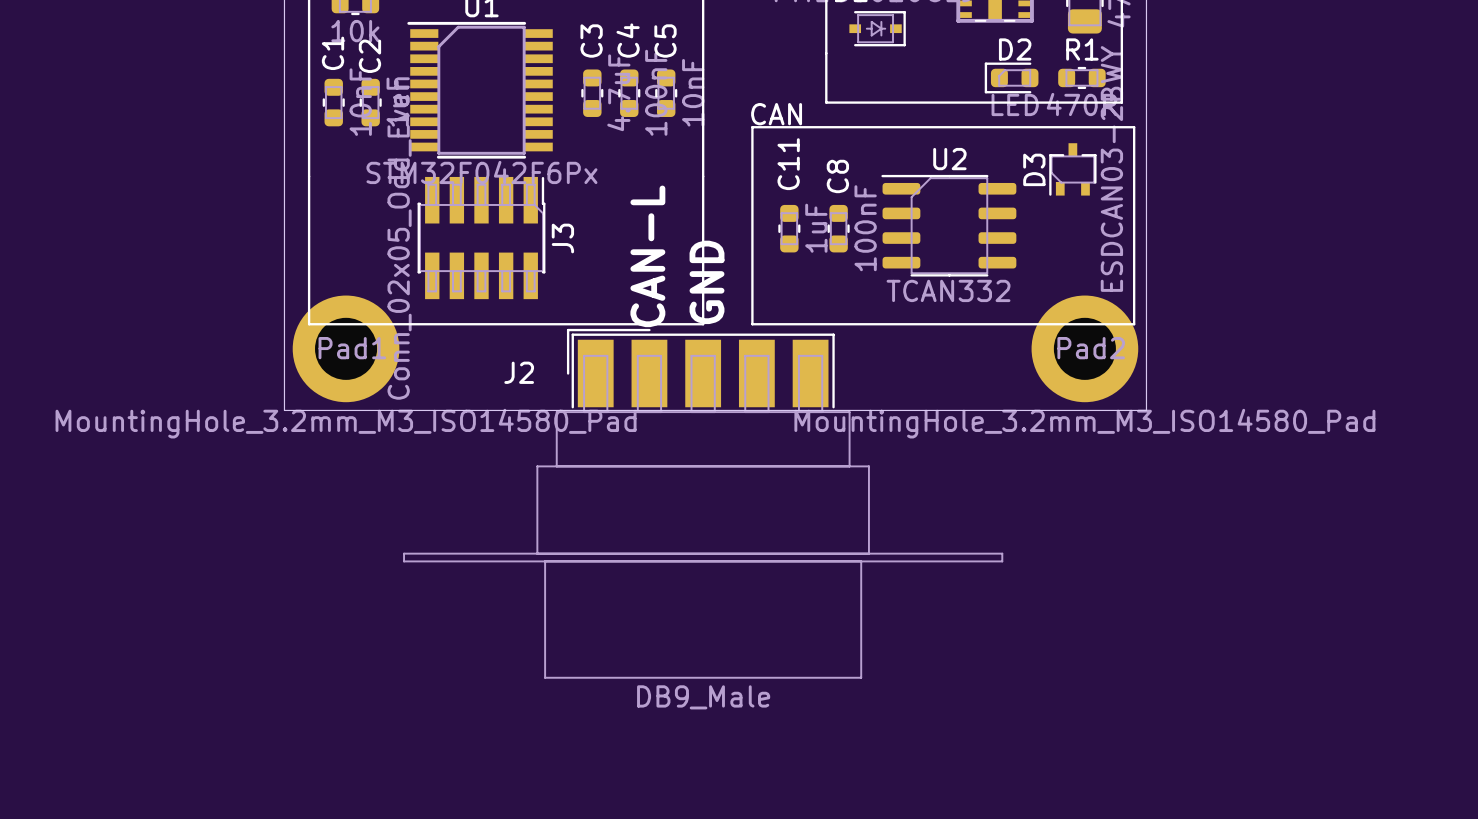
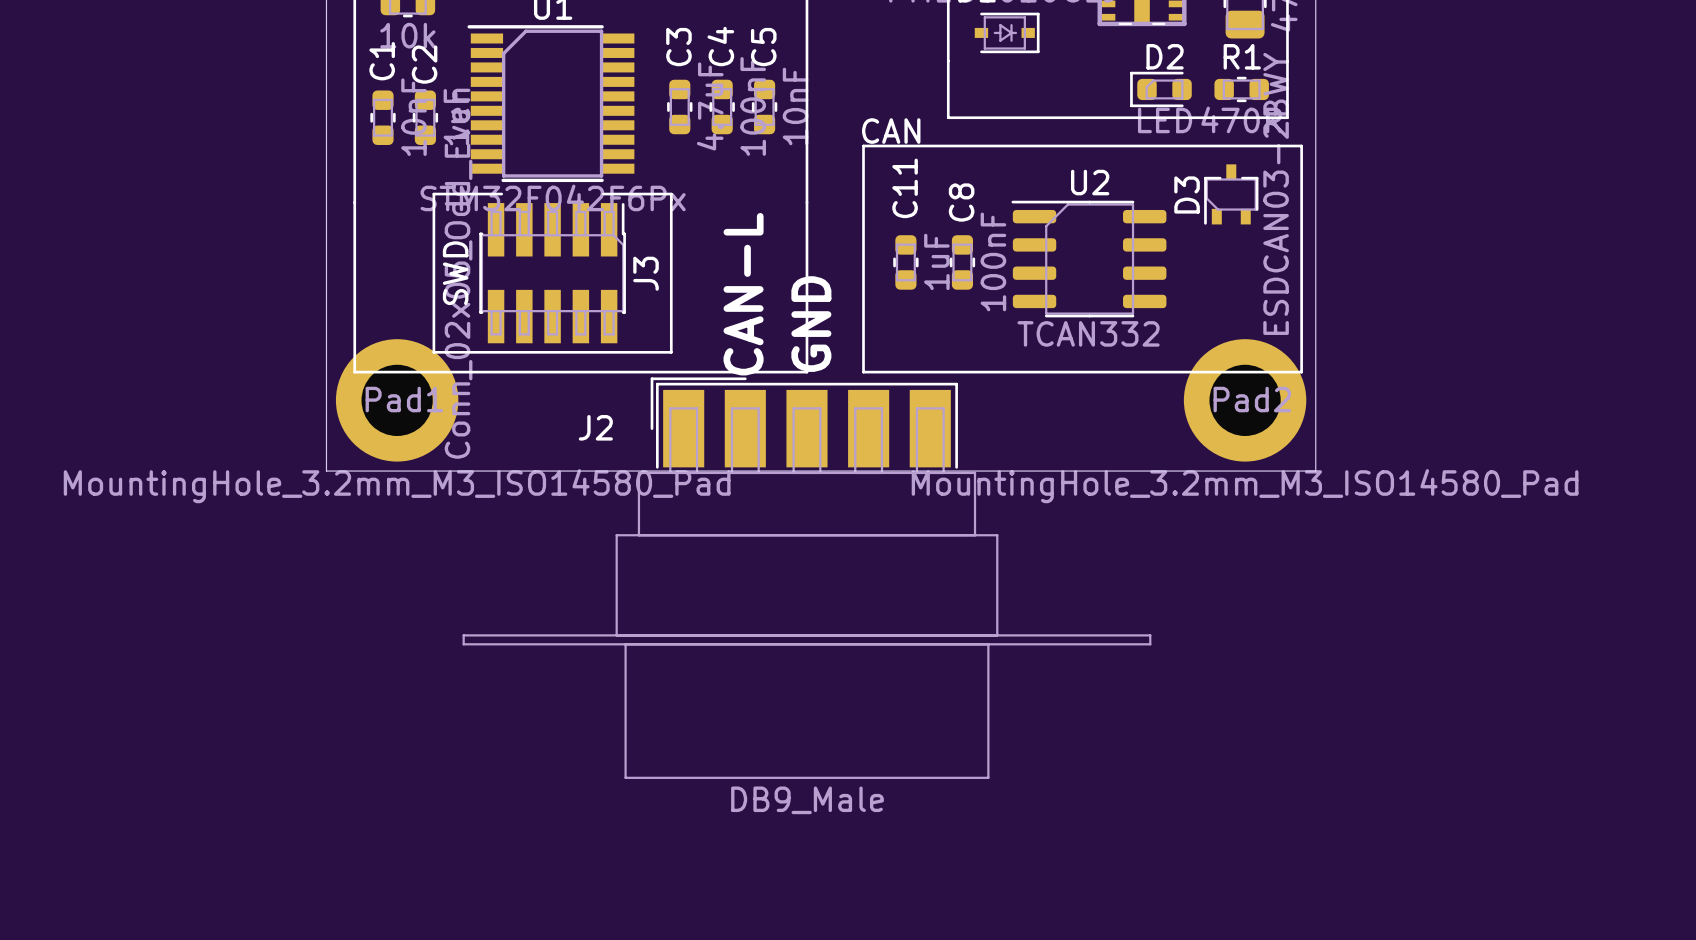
line: none -> (501, 194) (433, 194) (433, 352) (671, 352) (671, 194) (603, 194)
text: none -> SWD (455, 273)

